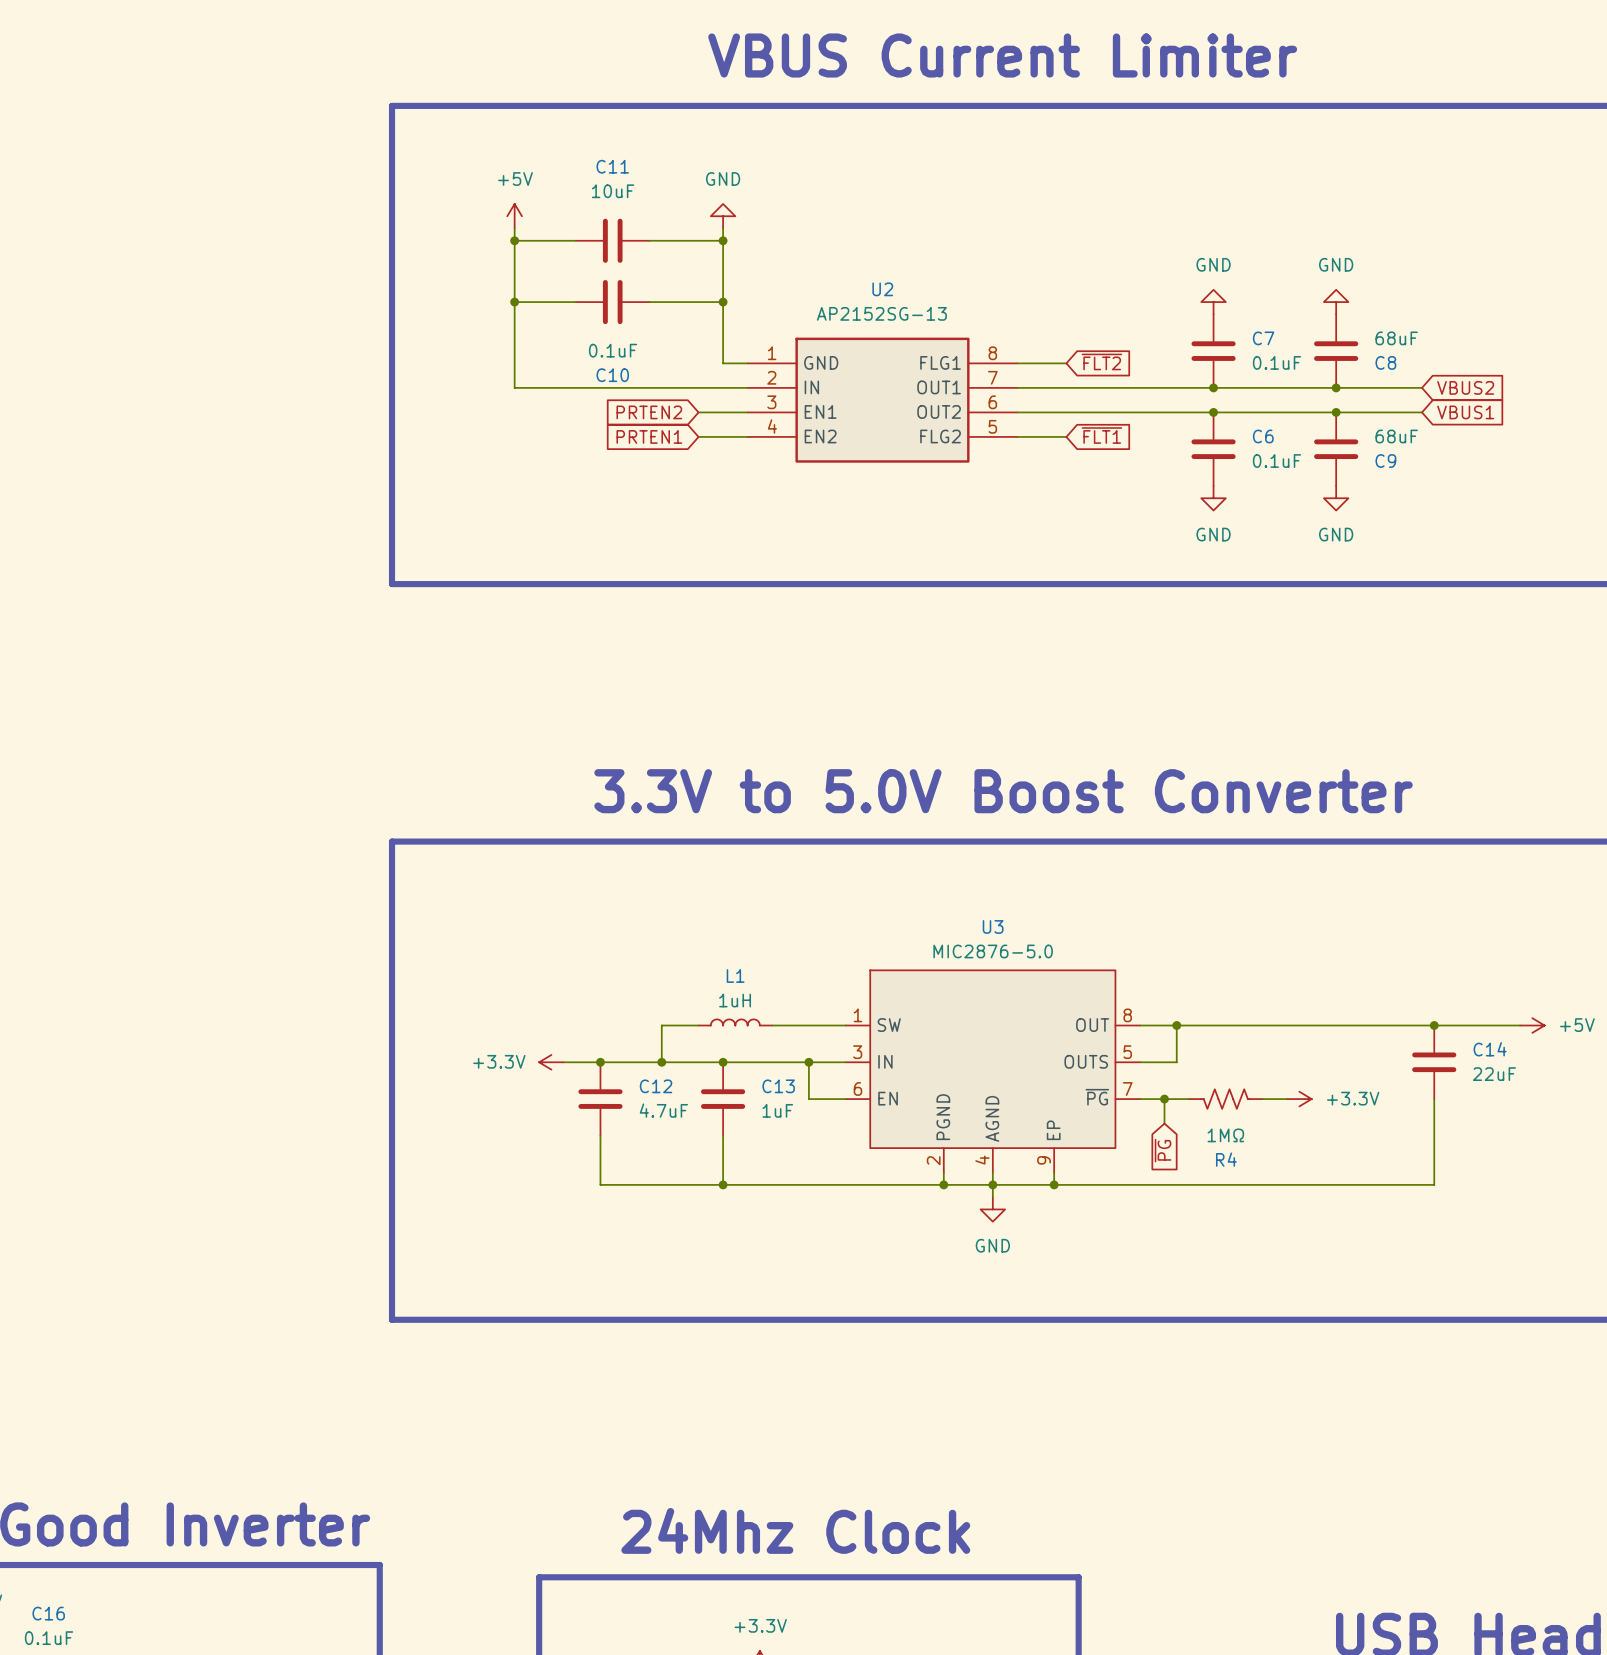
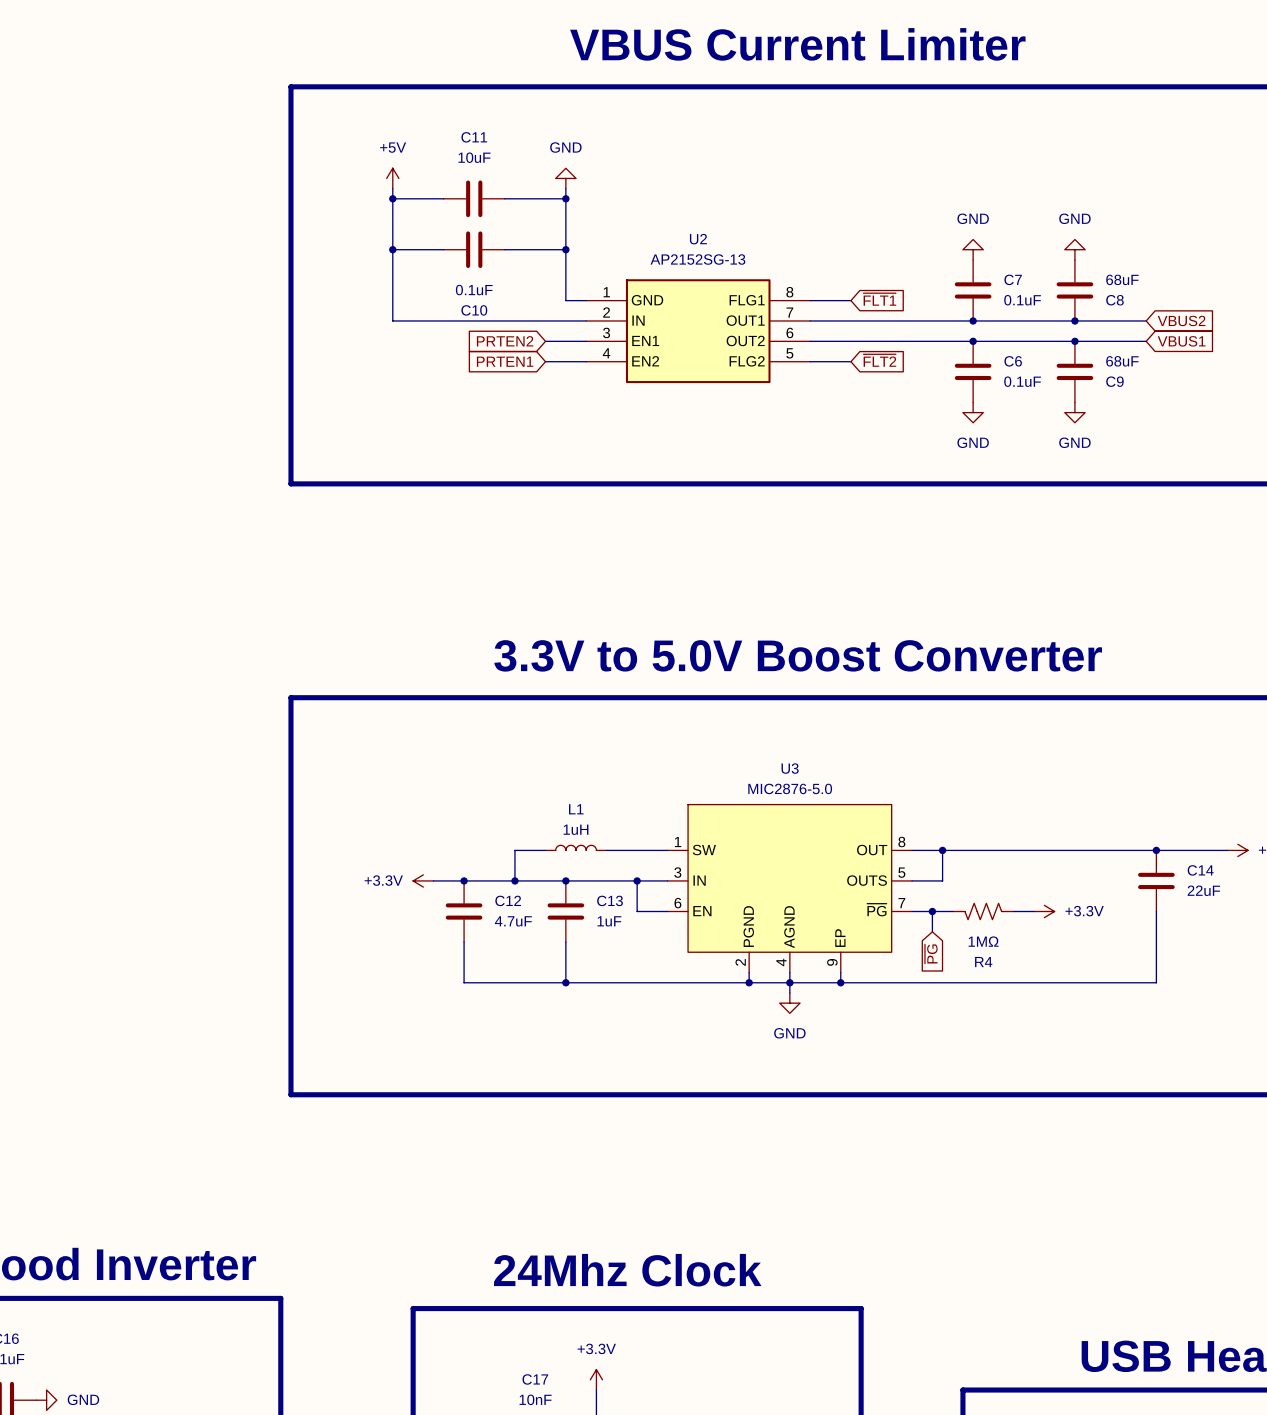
global label: ~{FLT2} (1101, 361) -> ~{FLT1} (879, 299)
global label: ~{FLT1} (1101, 435) -> ~{FLT2} (879, 360)

